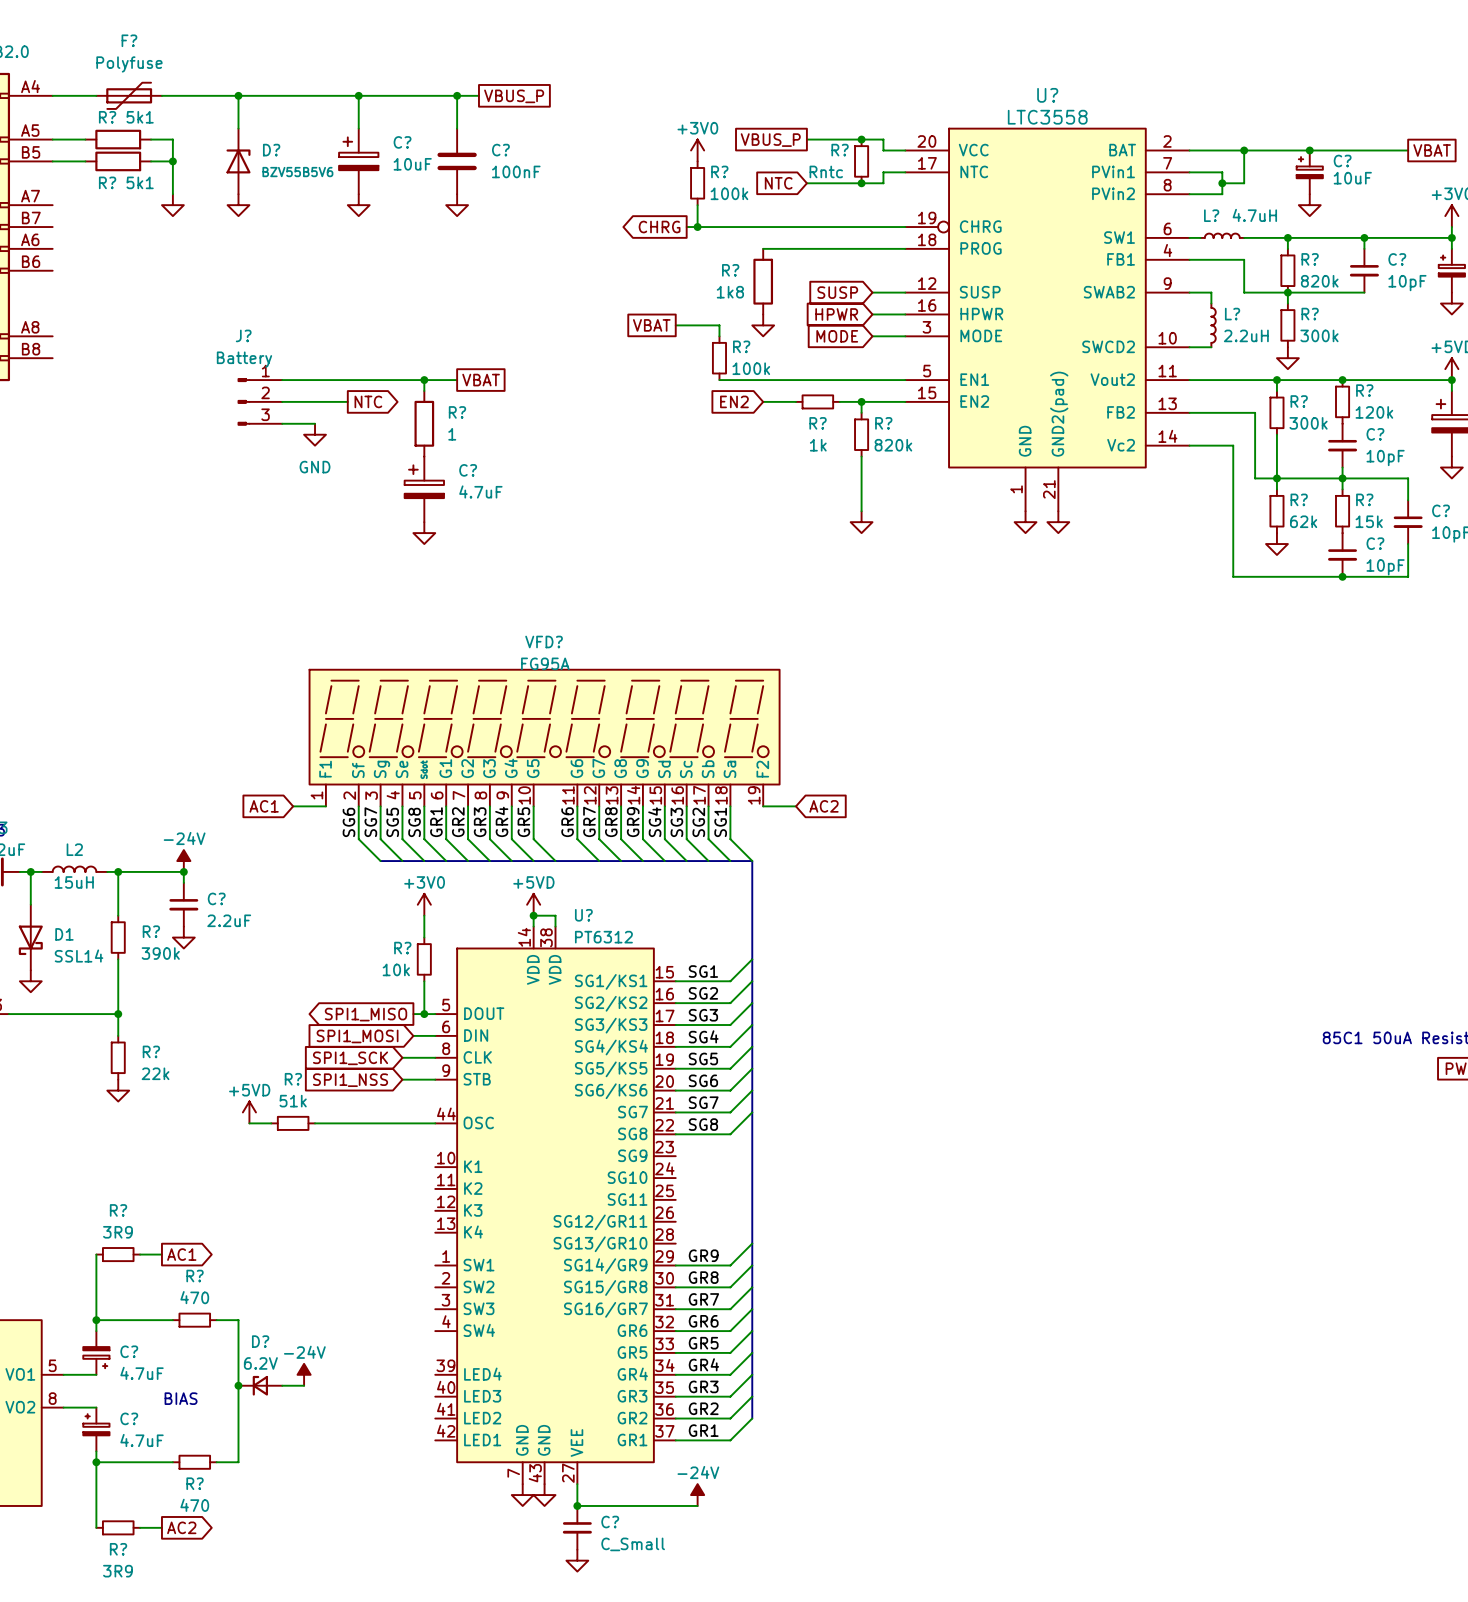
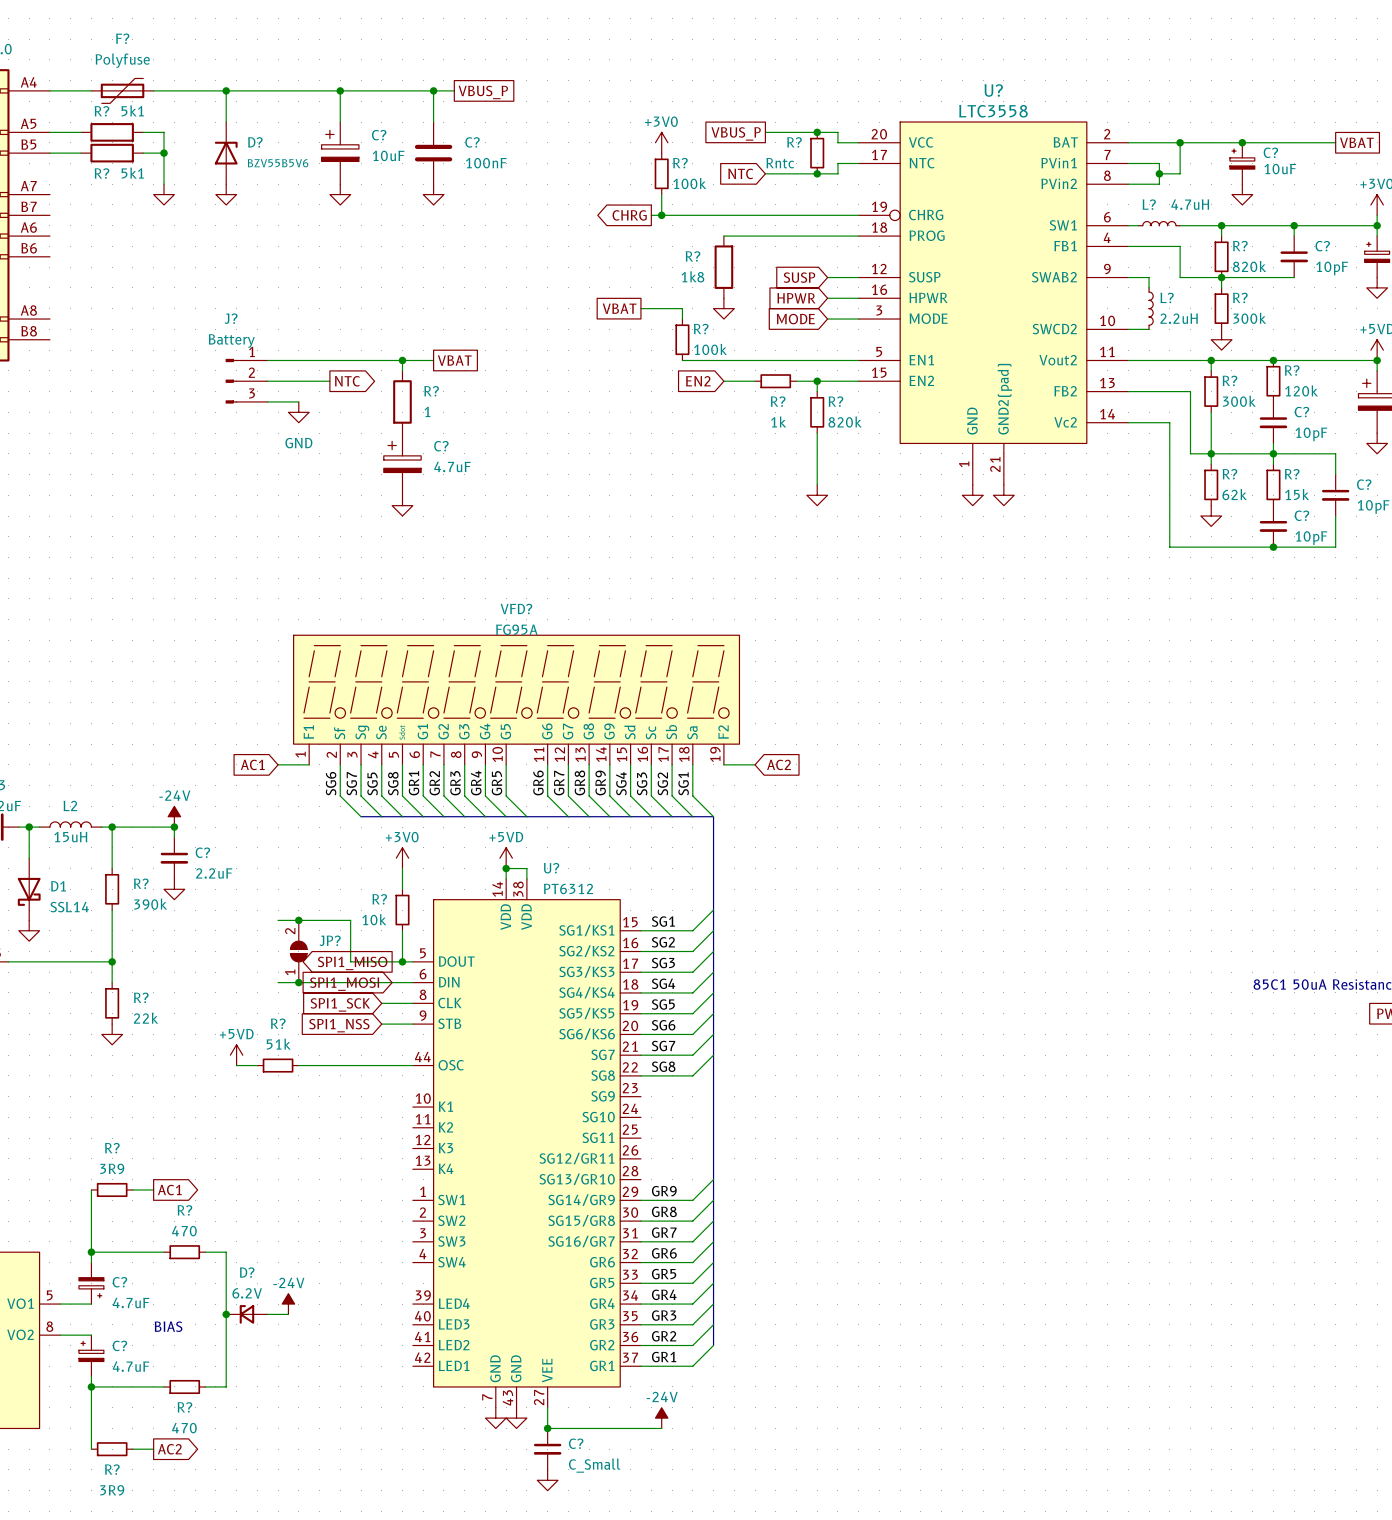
wire: none -> (278, 920) (350, 920) (350, 961) (392, 961)
junction: none -> (298, 920)
JP?: none -> (298, 951)
wire: none -> (278, 982) (392, 982)
junction: none -> (298, 982)

